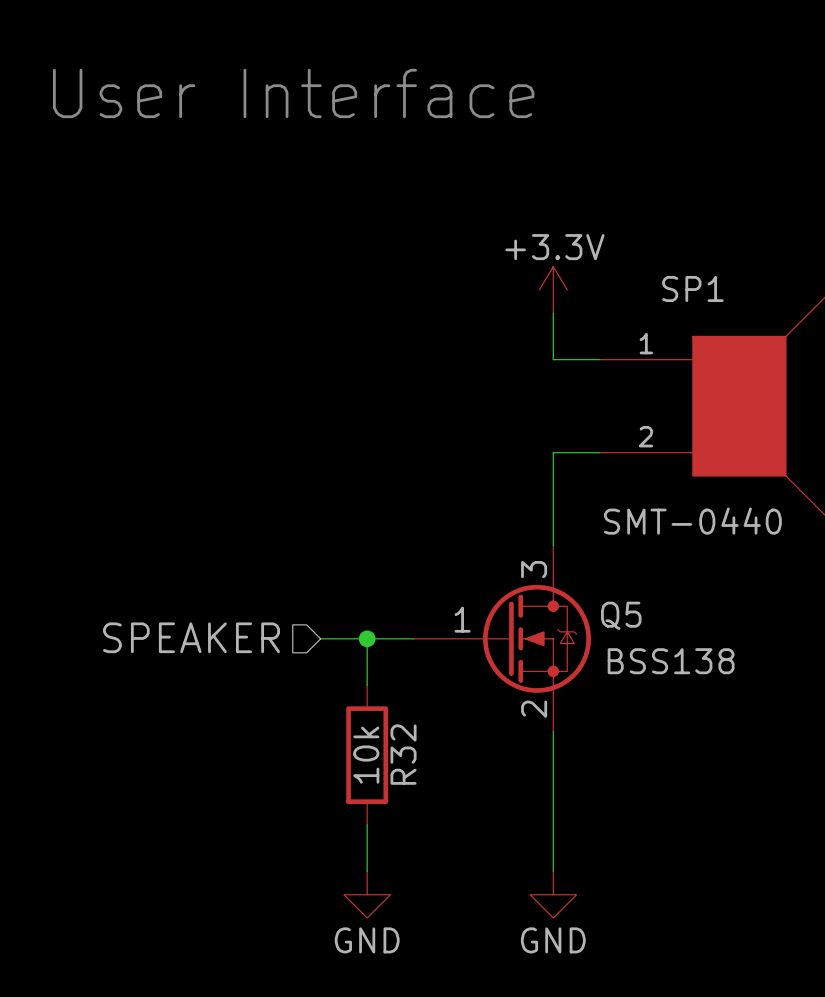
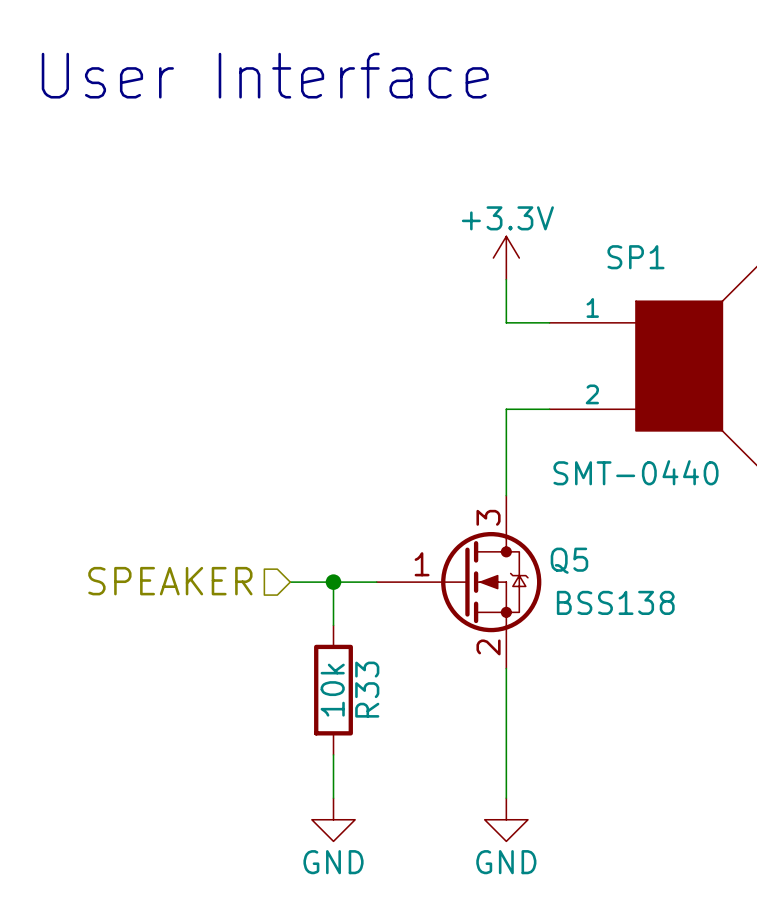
R32 name: R32 (403, 754) -> R33 (367, 689)

